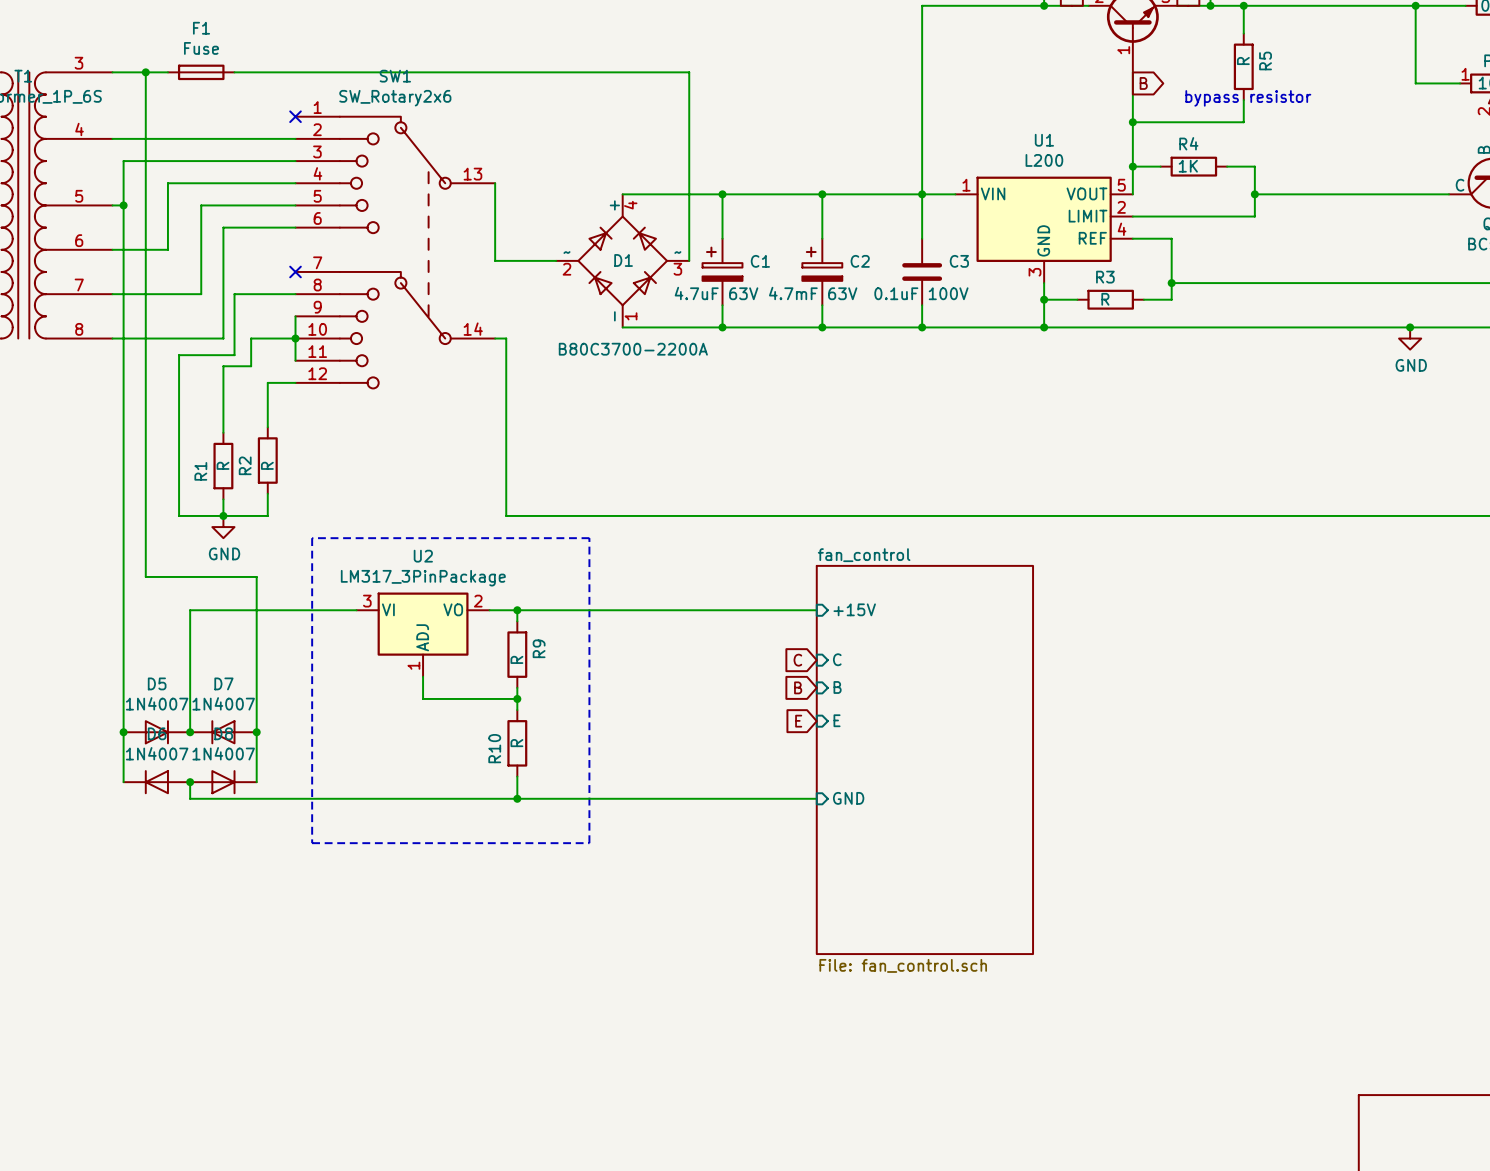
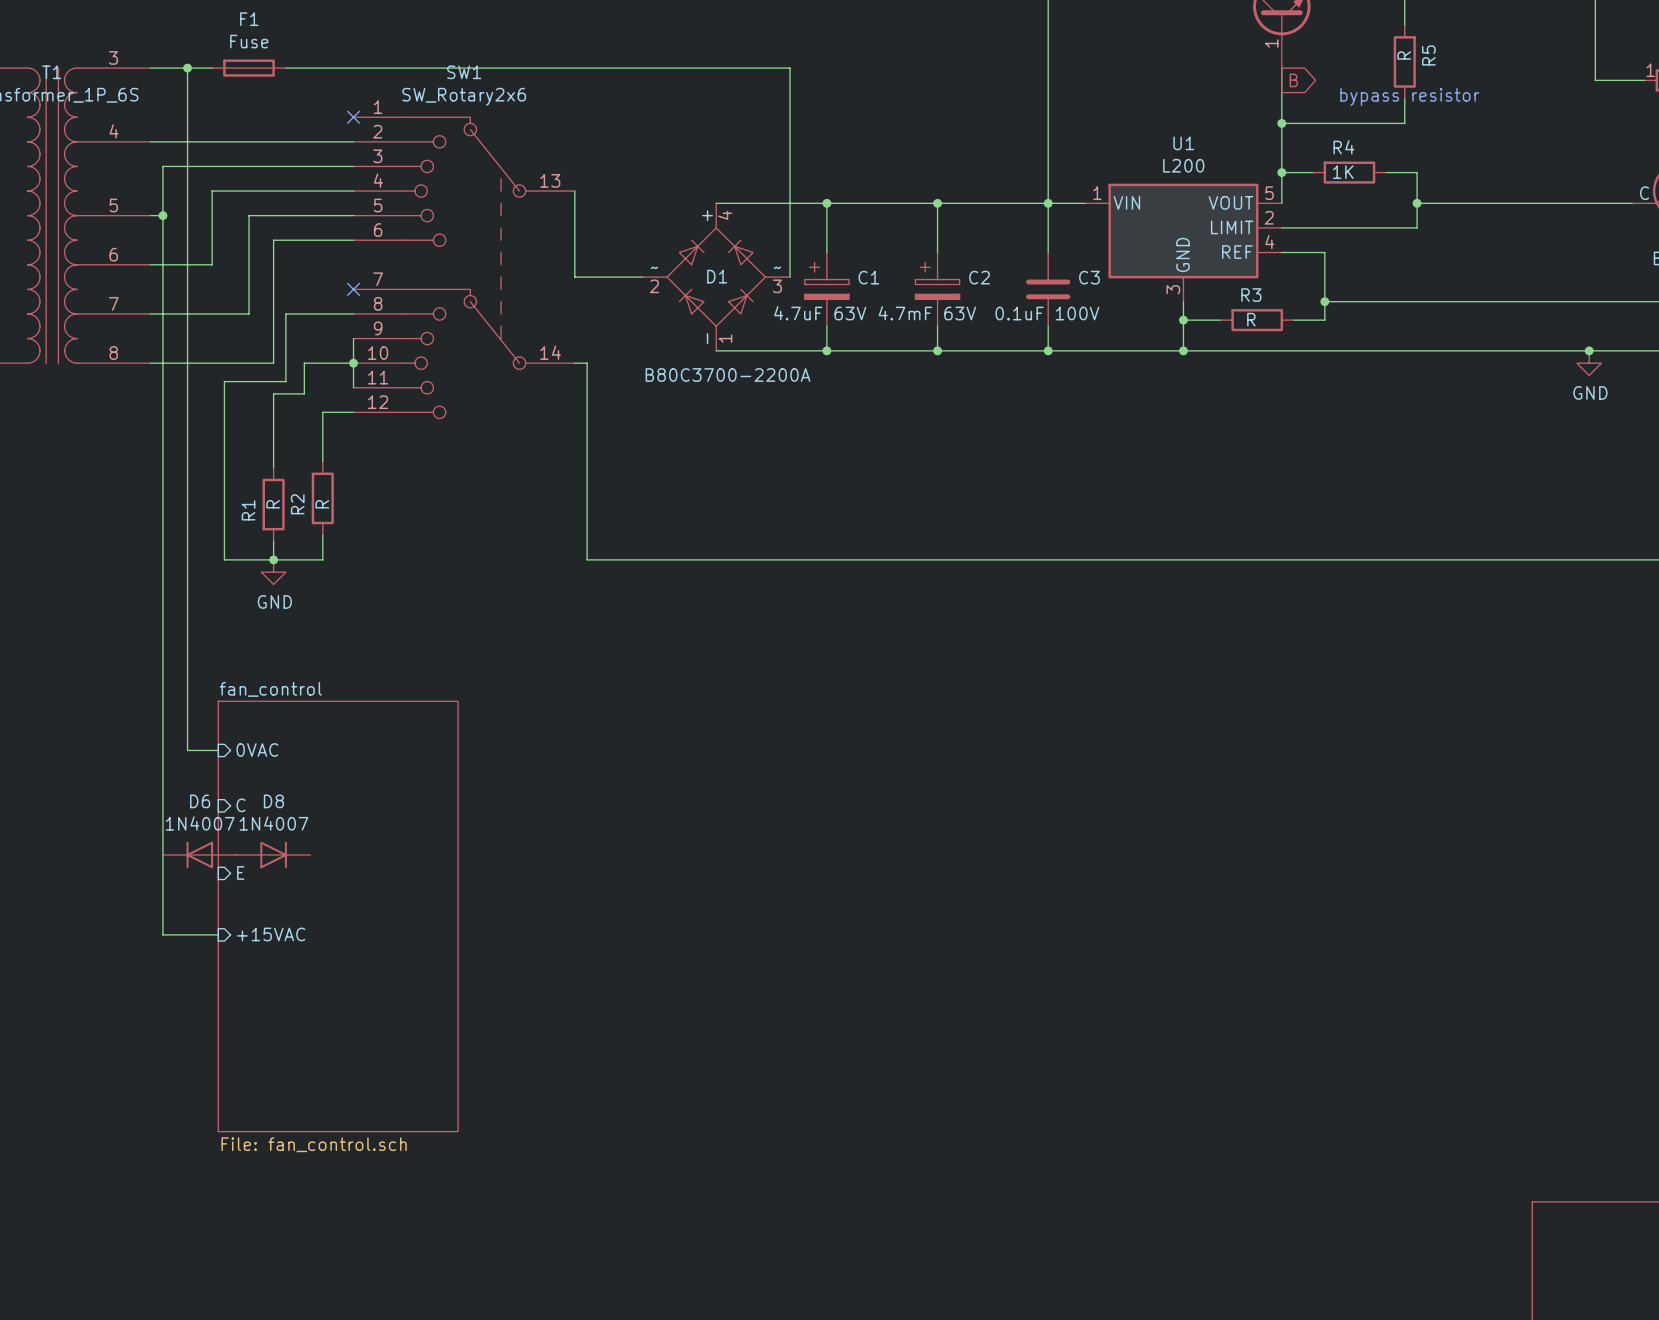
line: (312, 538) (312, 843) (589, 843) (589, 538) (312, 538) -> none
wire: (145, 576) (256, 576) (256, 782) -> (187, 627) (187, 750) (218, 750)
sheet pin: +15V (854, 609) -> none
wire: (356, 610) (190, 610) (190, 732) -> none
wire: (489, 610) (816, 610) -> none
wire: (517, 610) (517, 621) -> none
junction: (517, 610) -> none
U2: LM317_3PinPackage (423, 634) -> none
R9: R (517, 654) -> none
sheet pin: C (837, 659) -> none
global label: C (797, 660) -> none
wire: (423, 676) (423, 698) (517, 698) -> none
sheet pin: none -> 0VAC (257, 750)
wire: (517, 687) (517, 710) -> none
global label: B (798, 687) -> none
sheet pin: B (837, 687) -> none
junction: (517, 698) -> none
sheet pin: E (837, 720) -> none
global label: E (798, 721) -> none
junction: (123, 732) -> none
D5: 1N4007 (156, 732) -> none
junction: (190, 732) -> none
D7: 1N4007 (223, 732) -> none
junction: (256, 732) -> none
sheet pin: none -> C (241, 805)
R10: R (517, 743) -> none
sheet fan_control: File: fan_control.sch (924, 759) -> none
wire: (517, 776) (517, 798) -> none
wire: none -> (162, 854) (162, 934) (218, 934)
wire: (190, 782) (190, 798) (816, 798) -> none
junction: (190, 782) -> none
sheet pin: none -> E (240, 872)
junction: (517, 798) -> none
sheet pin: GND (848, 798) -> none
sheet fan_control: none -> File: fan_control.sch (338, 916)
sheet pin: none -> +15VAC (271, 934)

